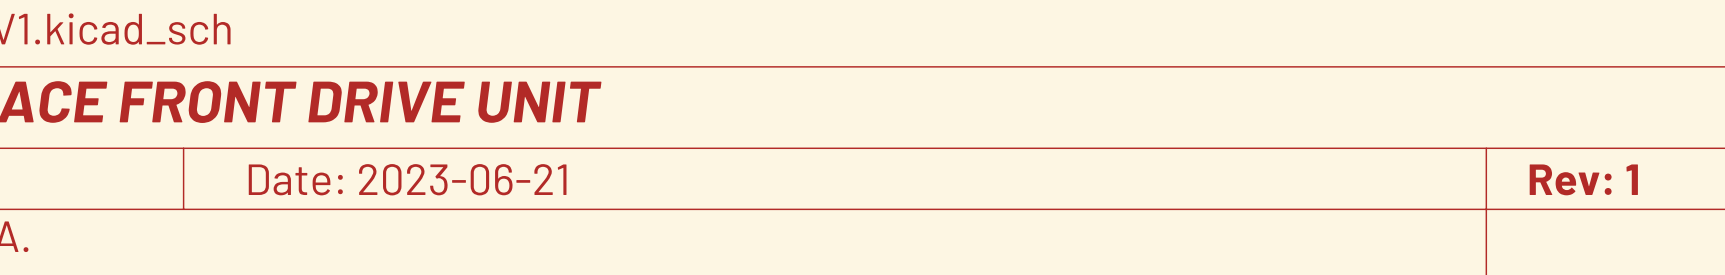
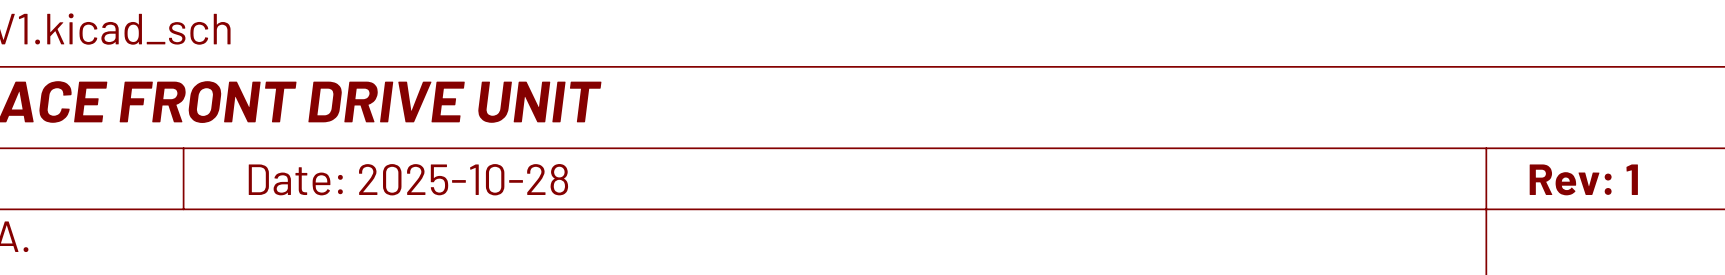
title block: Date: 2023-06-21 (407, 179) -> Date: 2025-10-28 (408, 179)

